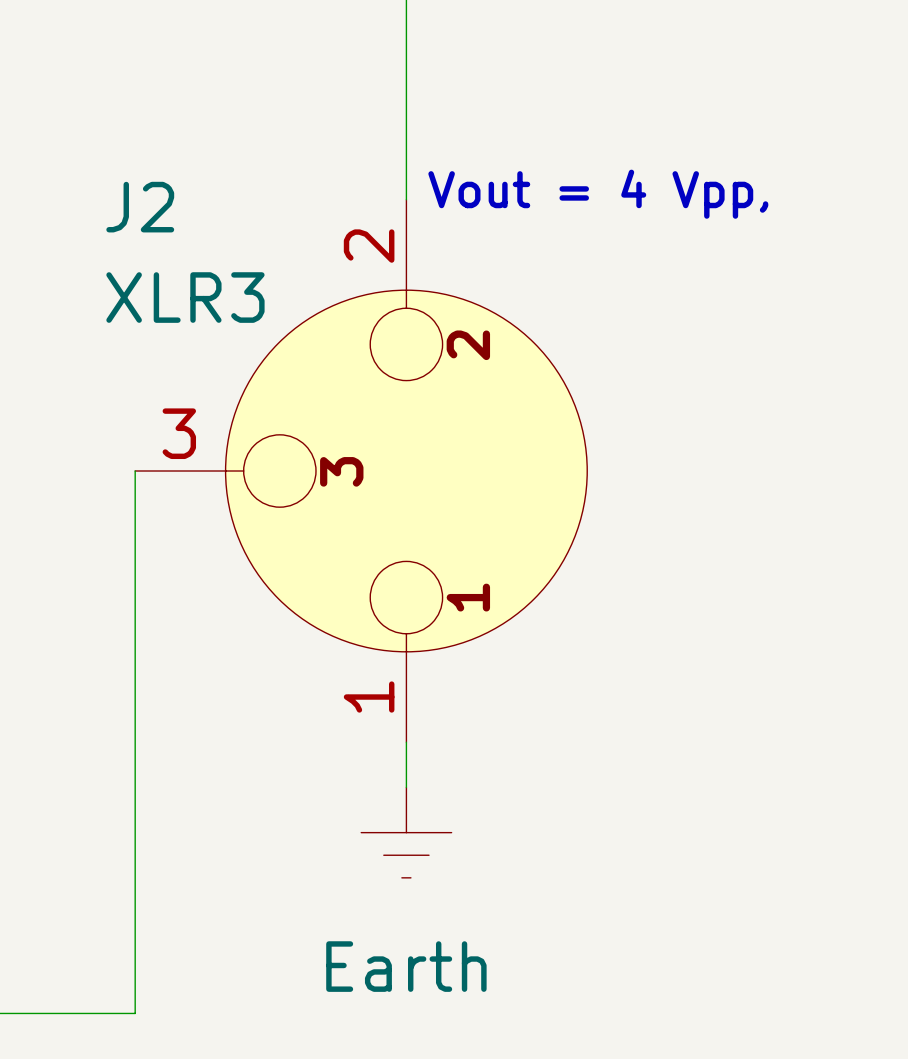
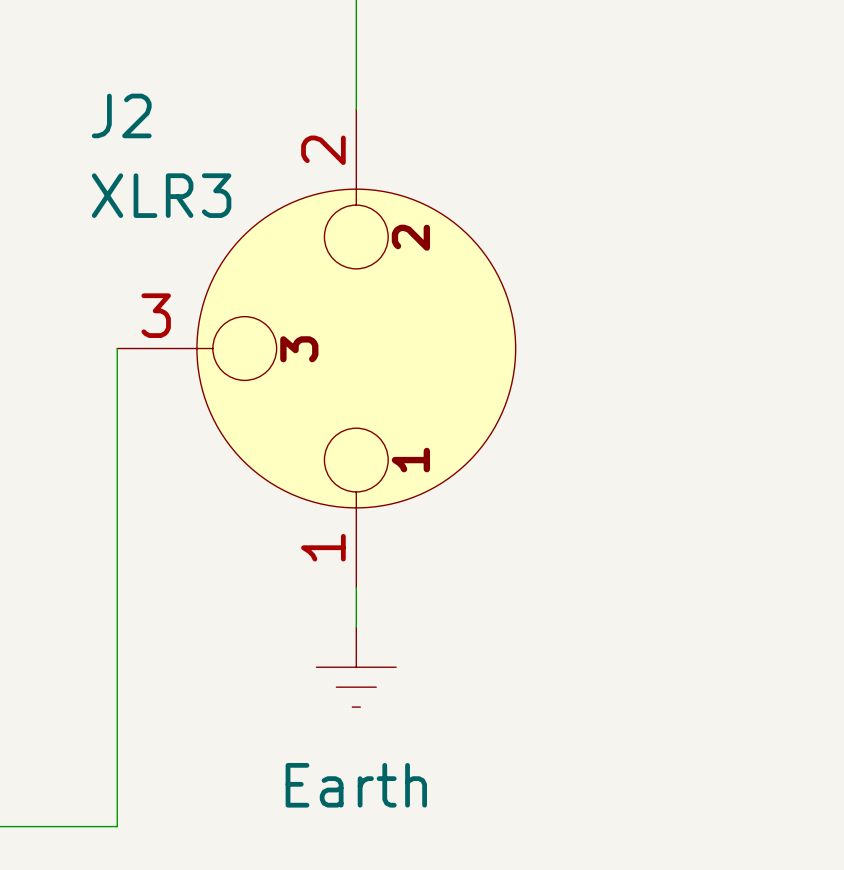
text: Vout = 4 Vpp, (598, 194) -> none

